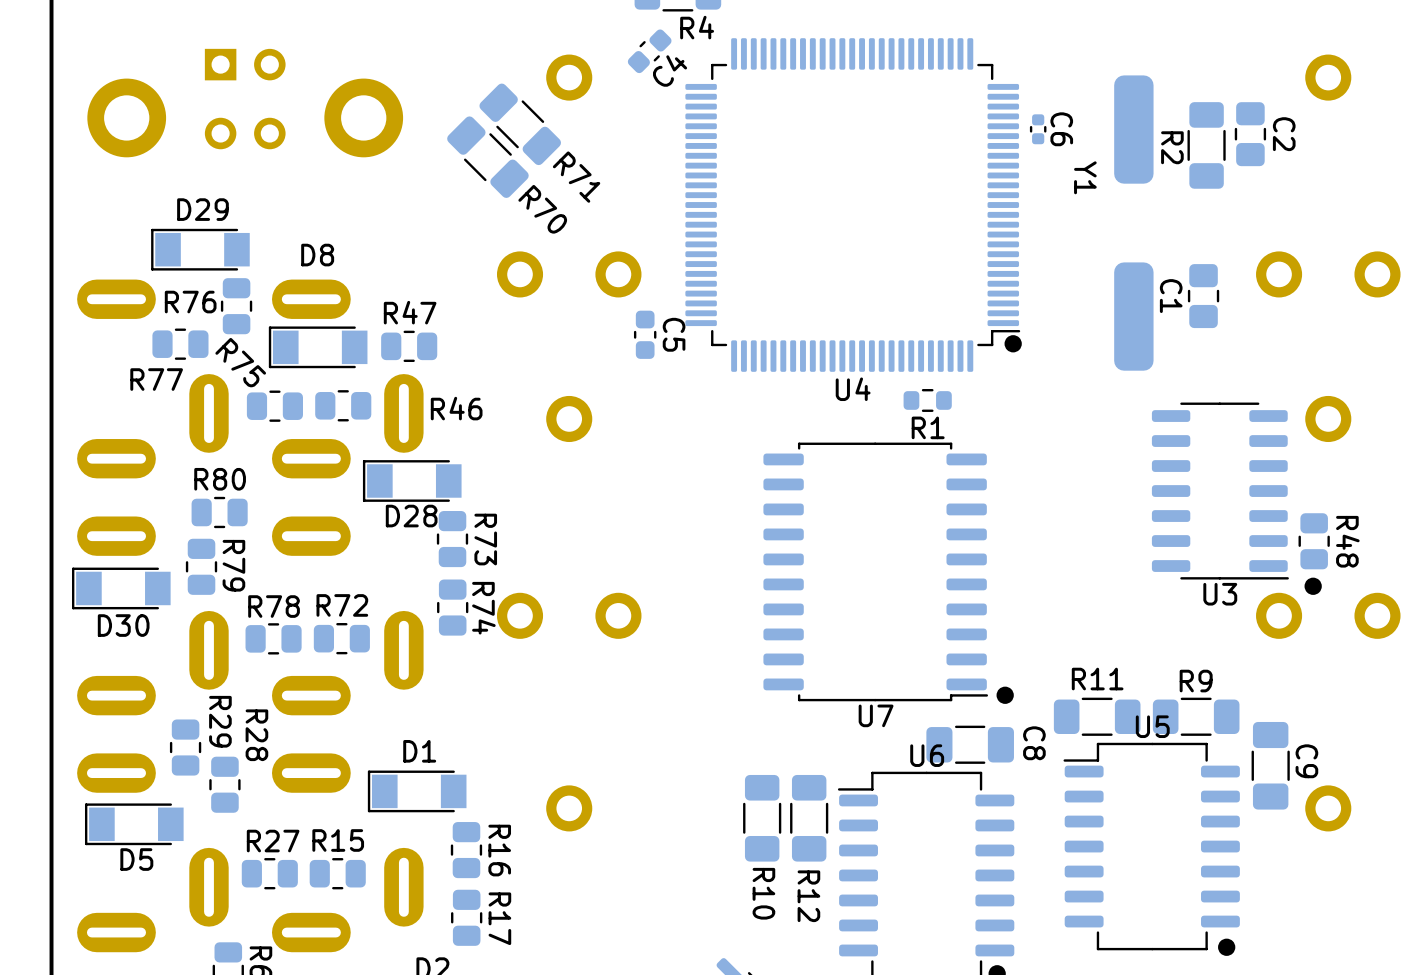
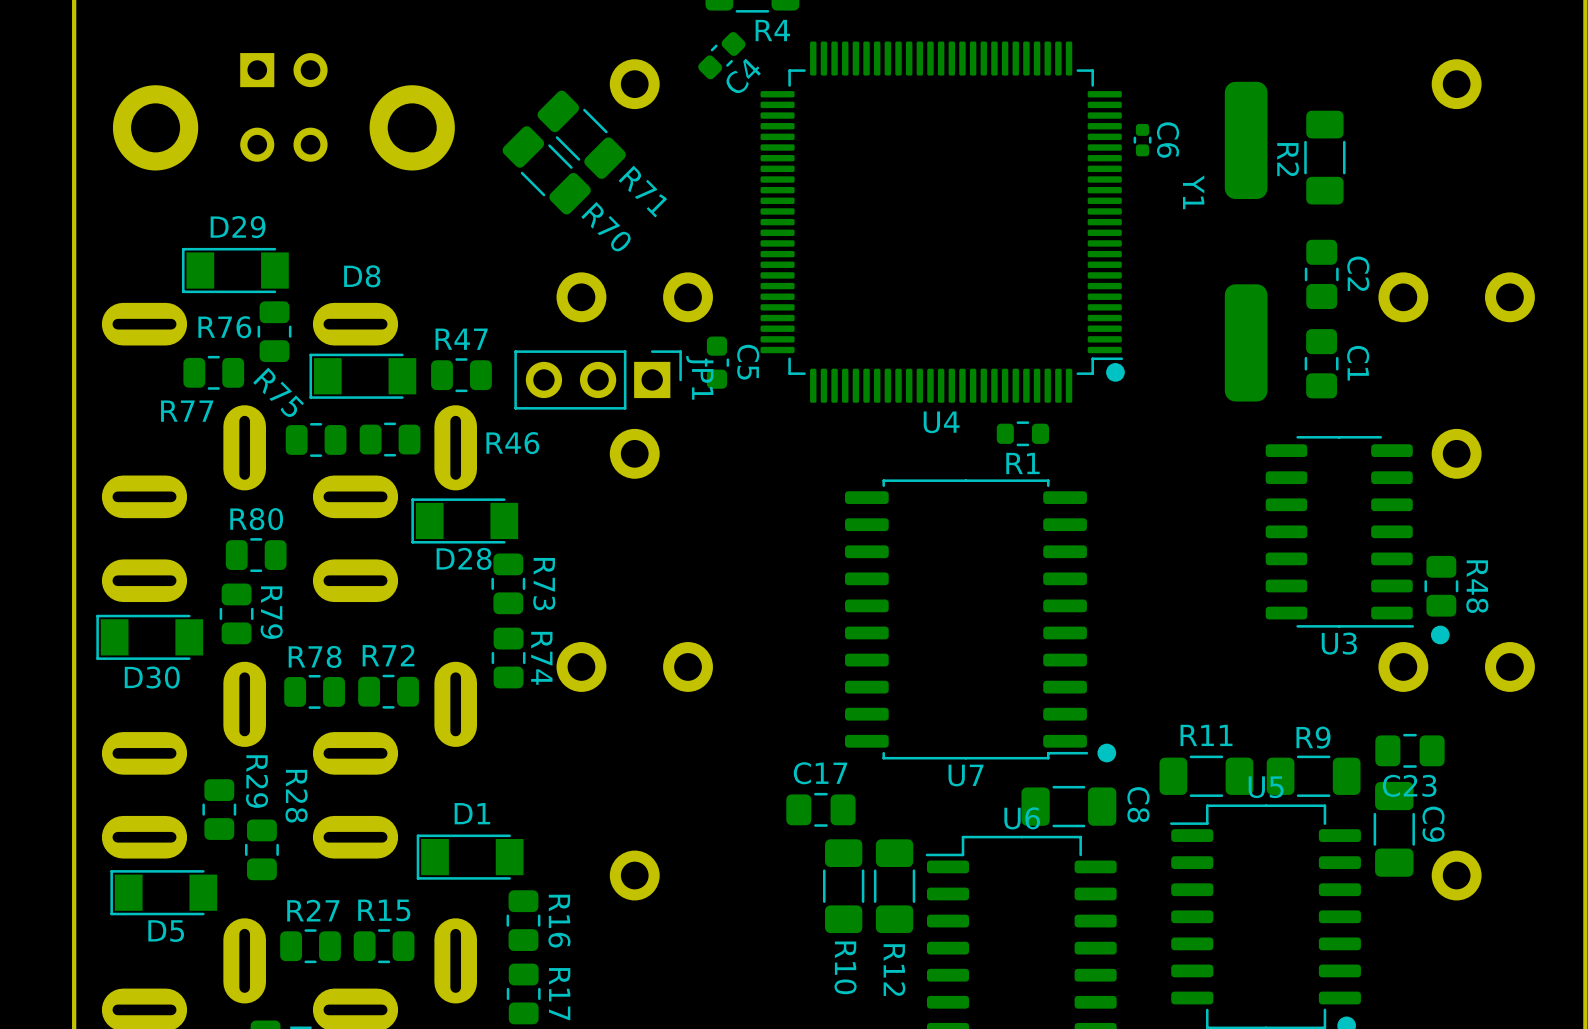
C2 position: (1250, 134) -> (1321, 274)
C1 name position: C1 (1171, 296) -> C1 (1358, 363)
C1 position: (1203, 296) -> (1321, 363)
JP1: none -> (598, 379)
C23: none -> (1409, 750)
C17: none -> (820, 809)

